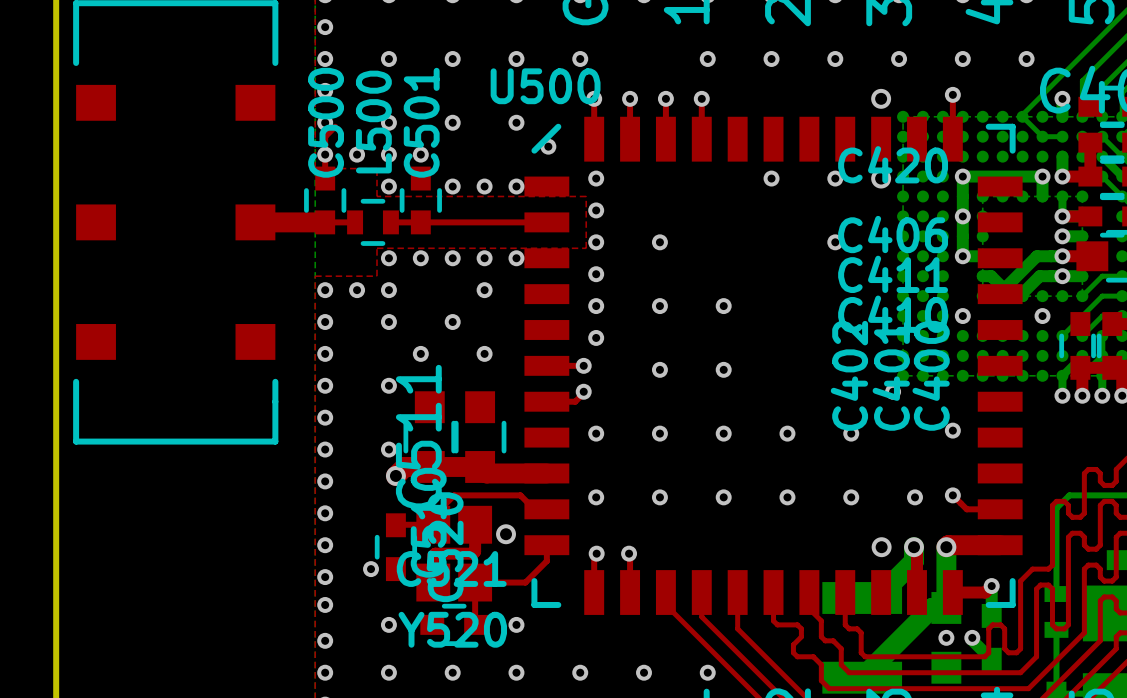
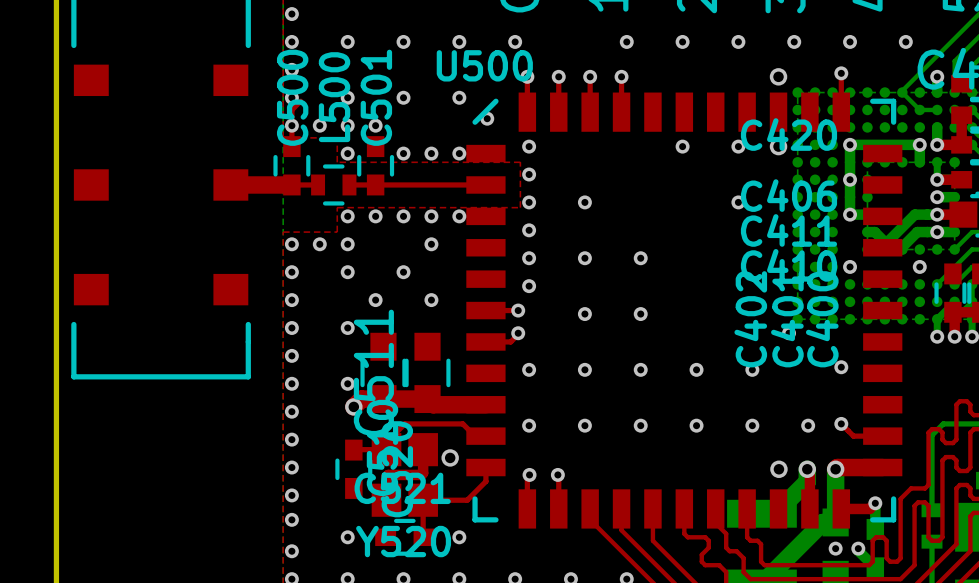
via: (371, 569) -> none

